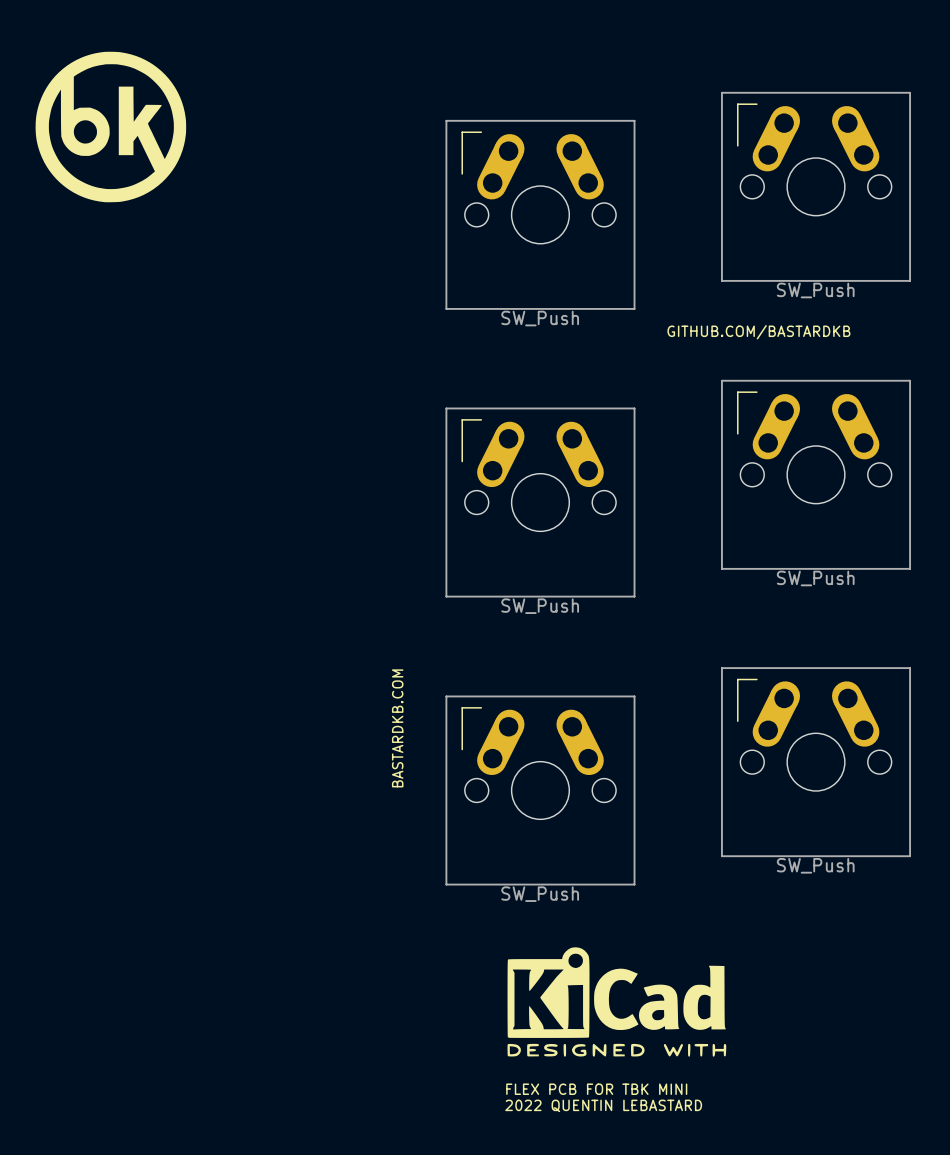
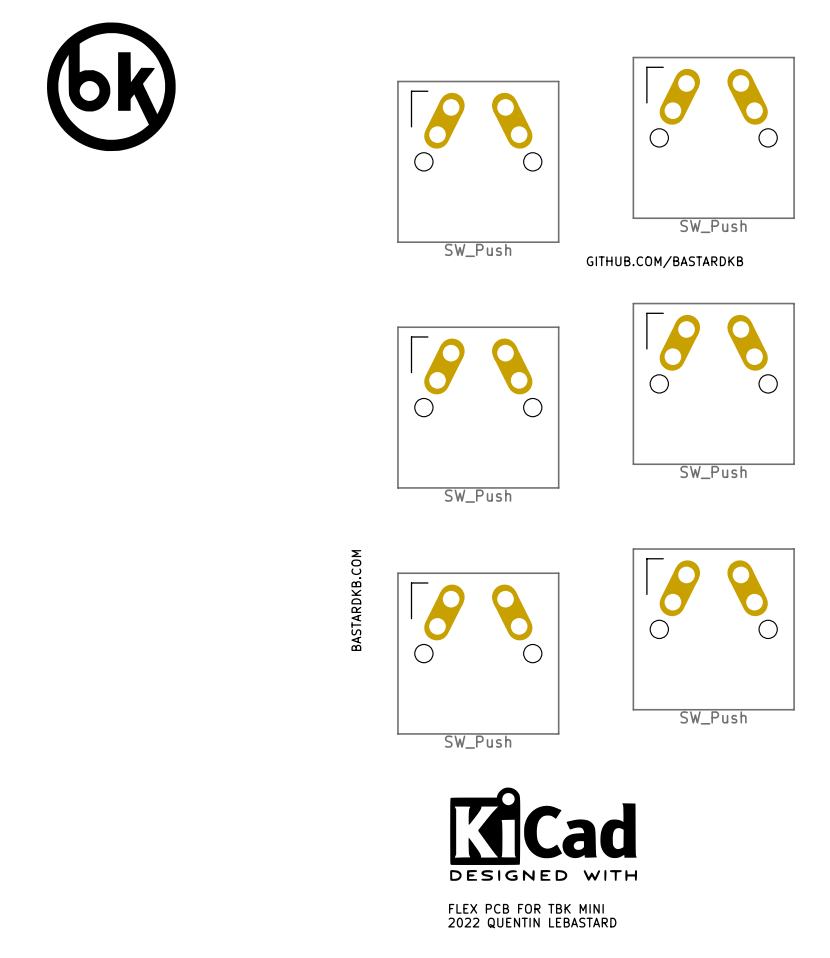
part footprint: [721, 91, 912, 282] -> [632, 56, 795, 220]
part footprint: [445, 119, 636, 310] -> [397, 80, 560, 244]
part footprint: [721, 379, 912, 570] -> [632, 302, 795, 466]
part footprint: [445, 407, 636, 598] -> [397, 326, 560, 489]
part footprint: [721, 667, 912, 858] -> [632, 548, 795, 711]
part footprint: [445, 695, 636, 886] -> [397, 572, 560, 735]

